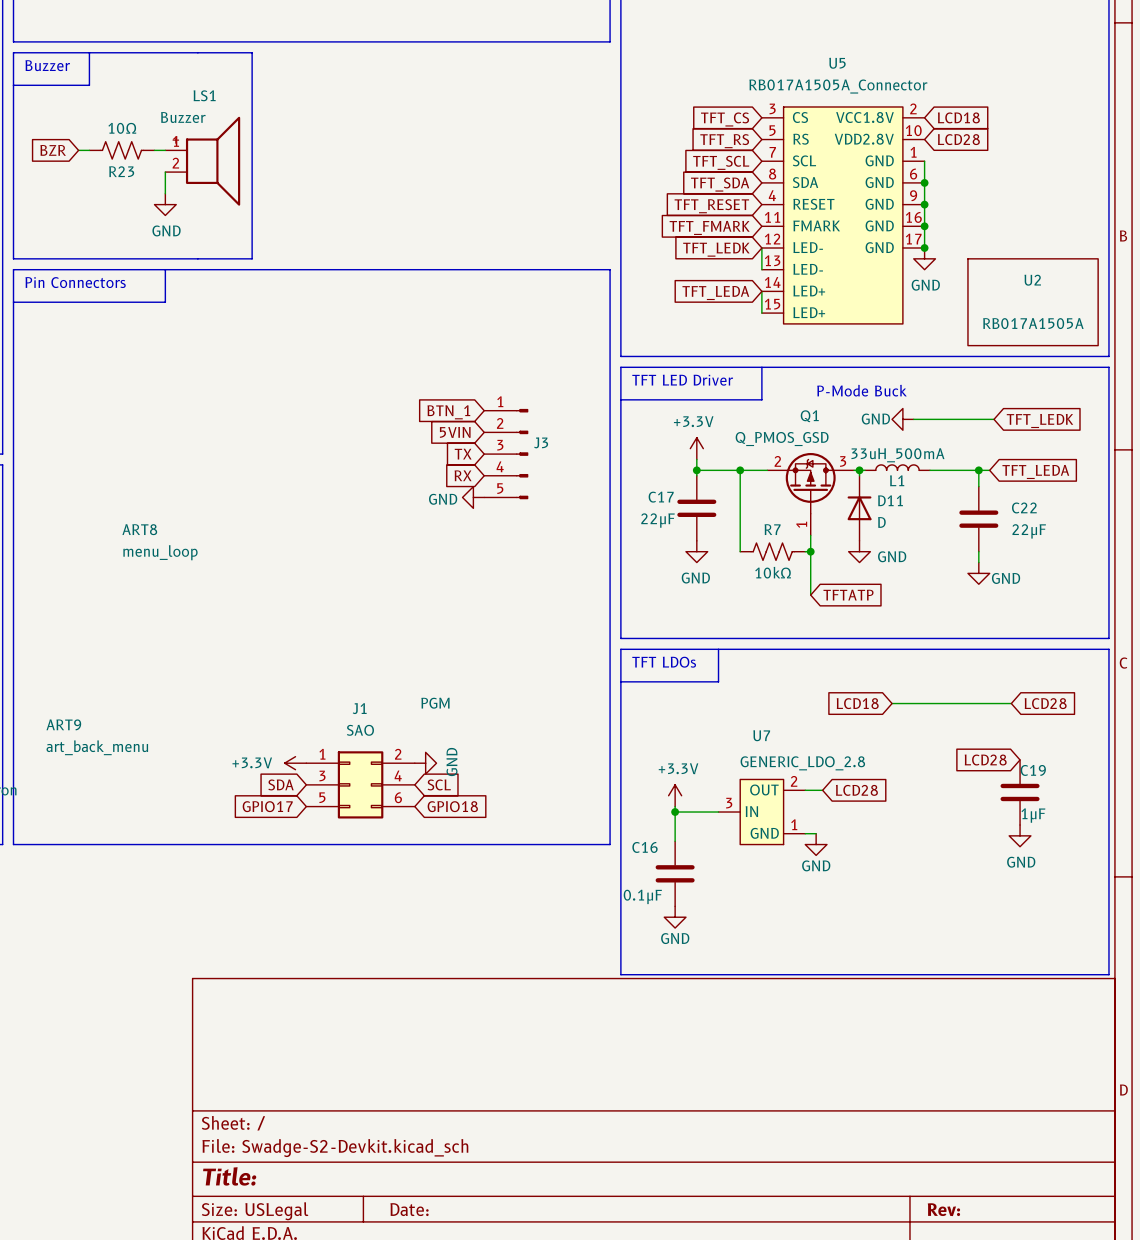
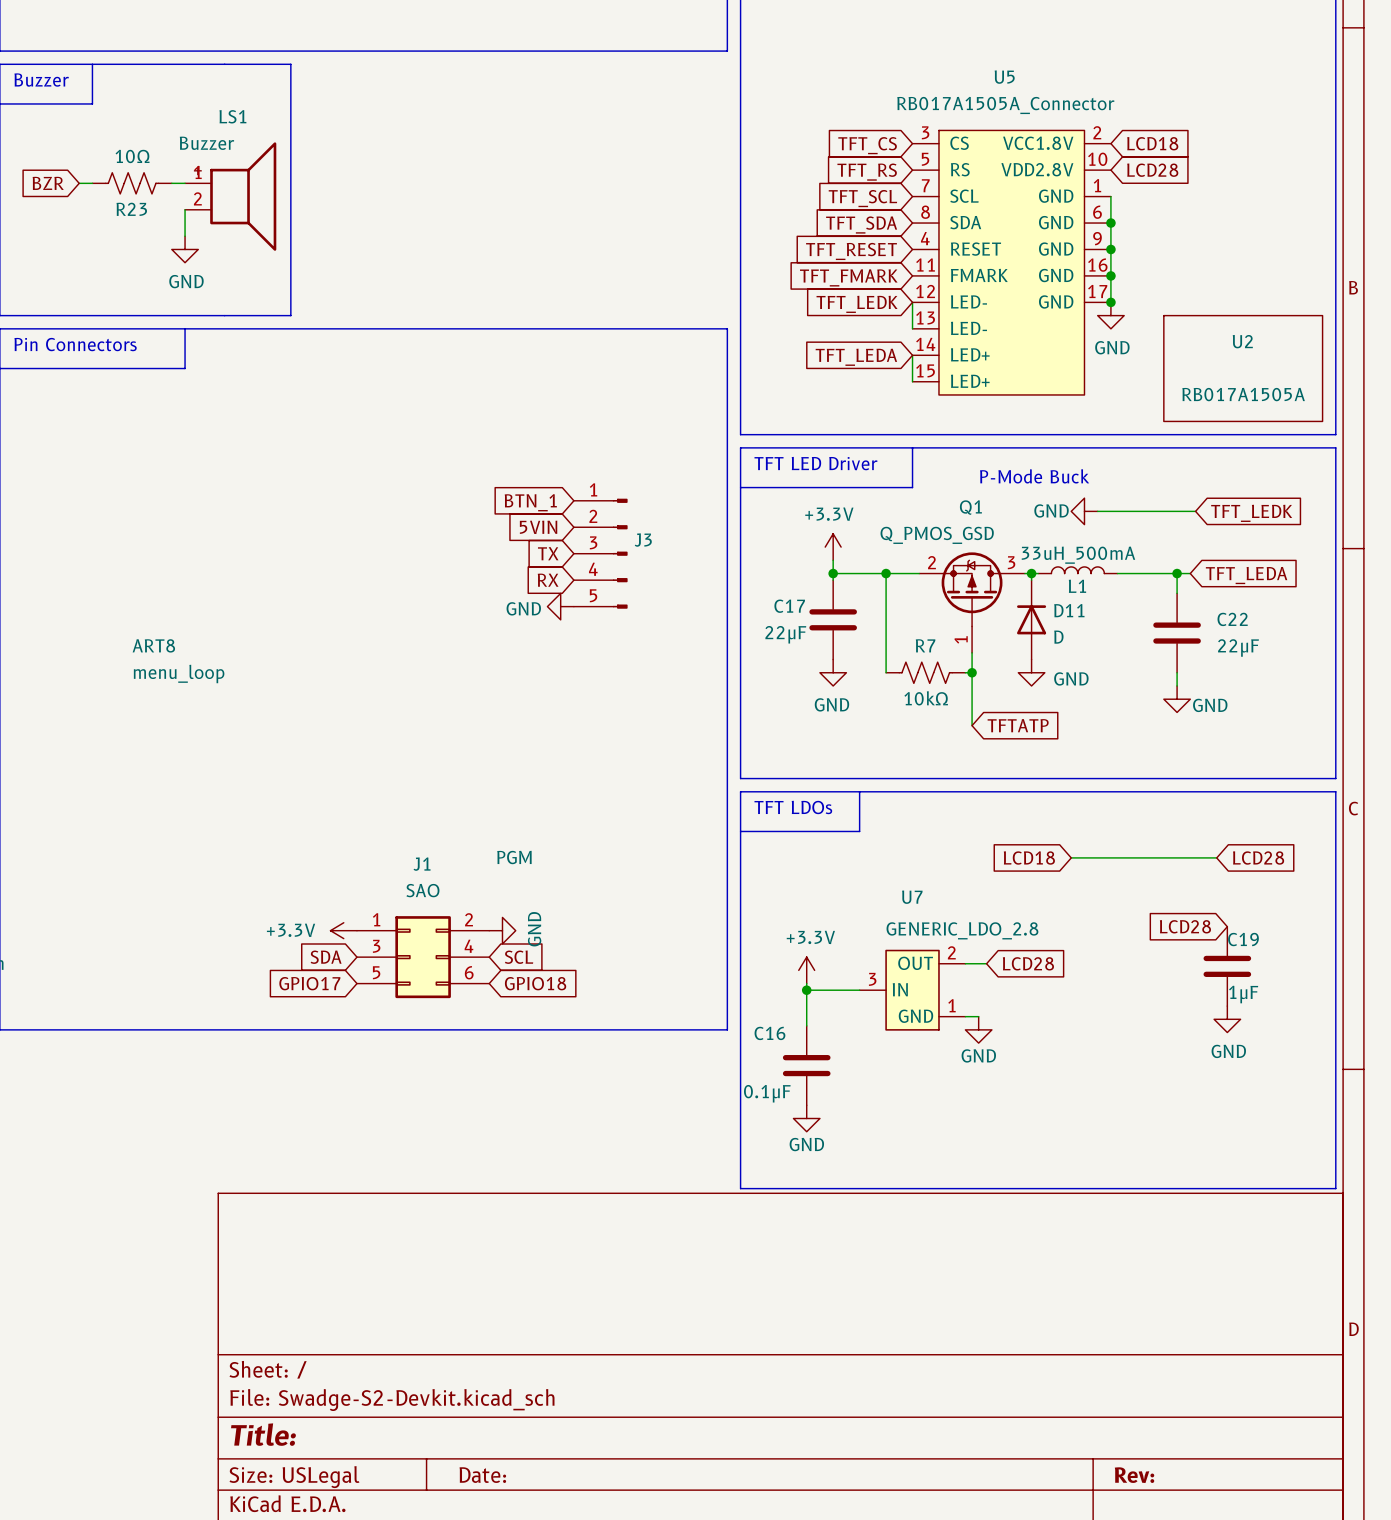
ART9: art_back_menu (97, 737) -> none

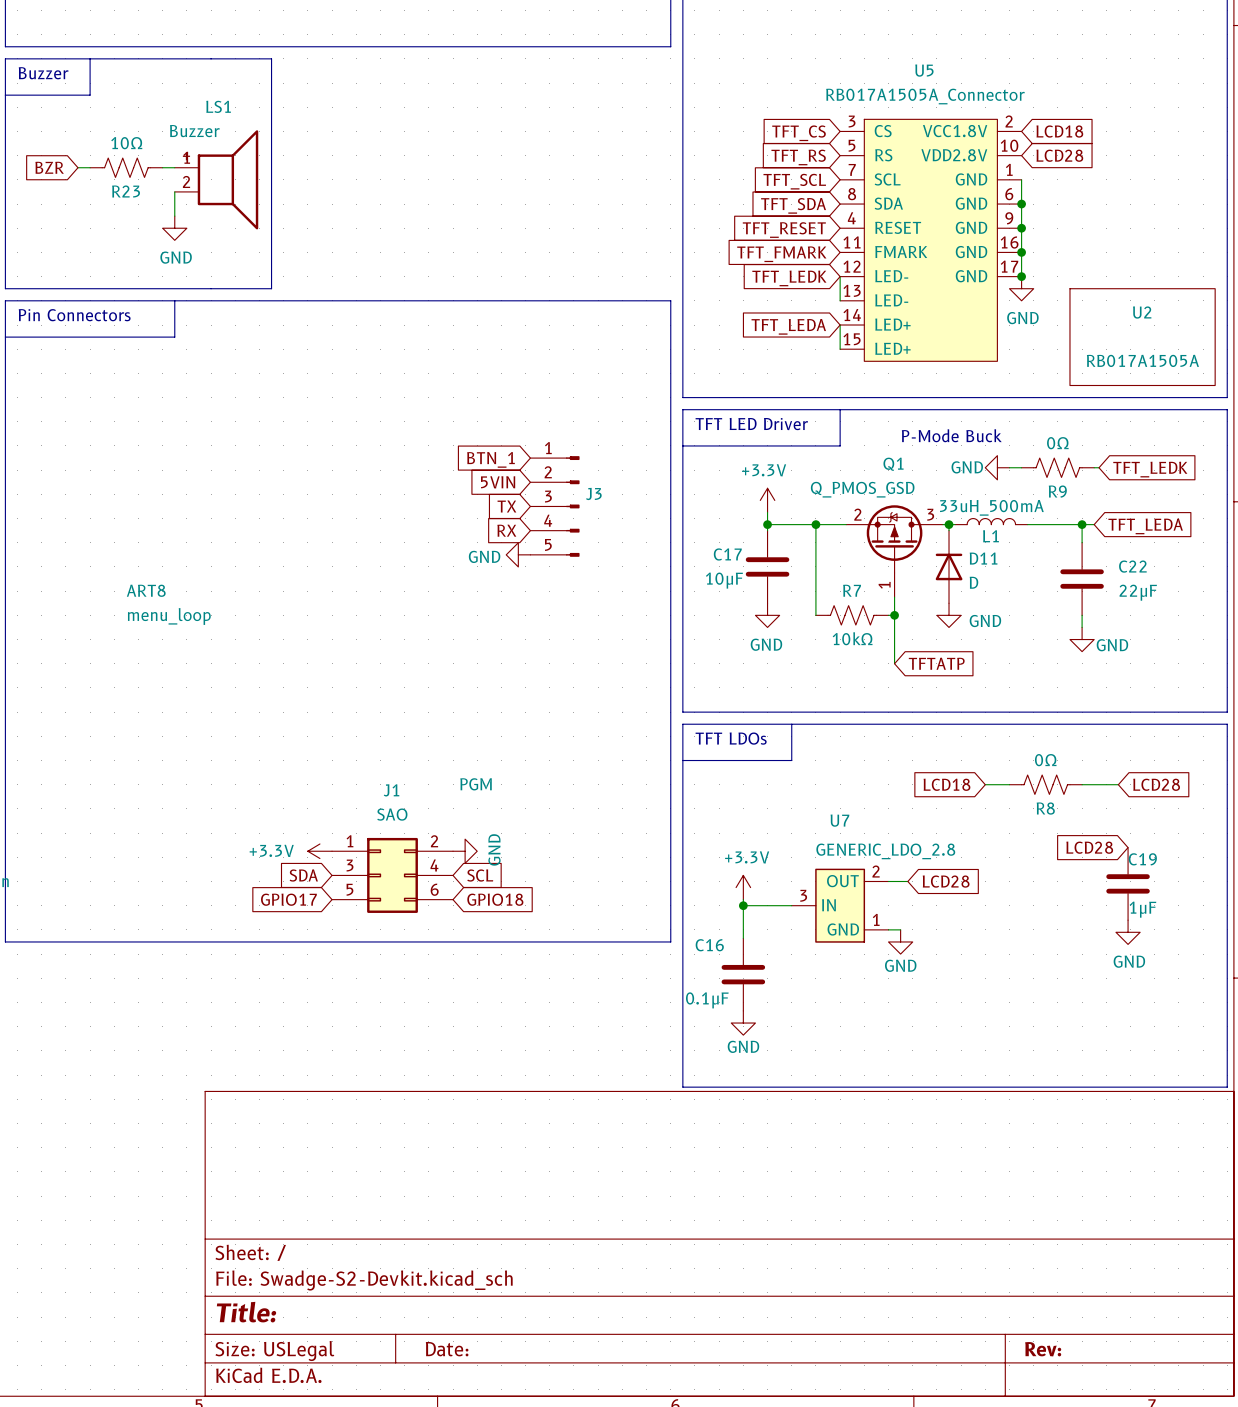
R9: none -> 0Ω (1057, 467)
C17 value: 22μF (785, 634) -> 10μF (724, 580)
R8: none -> 0Ω (1045, 784)

